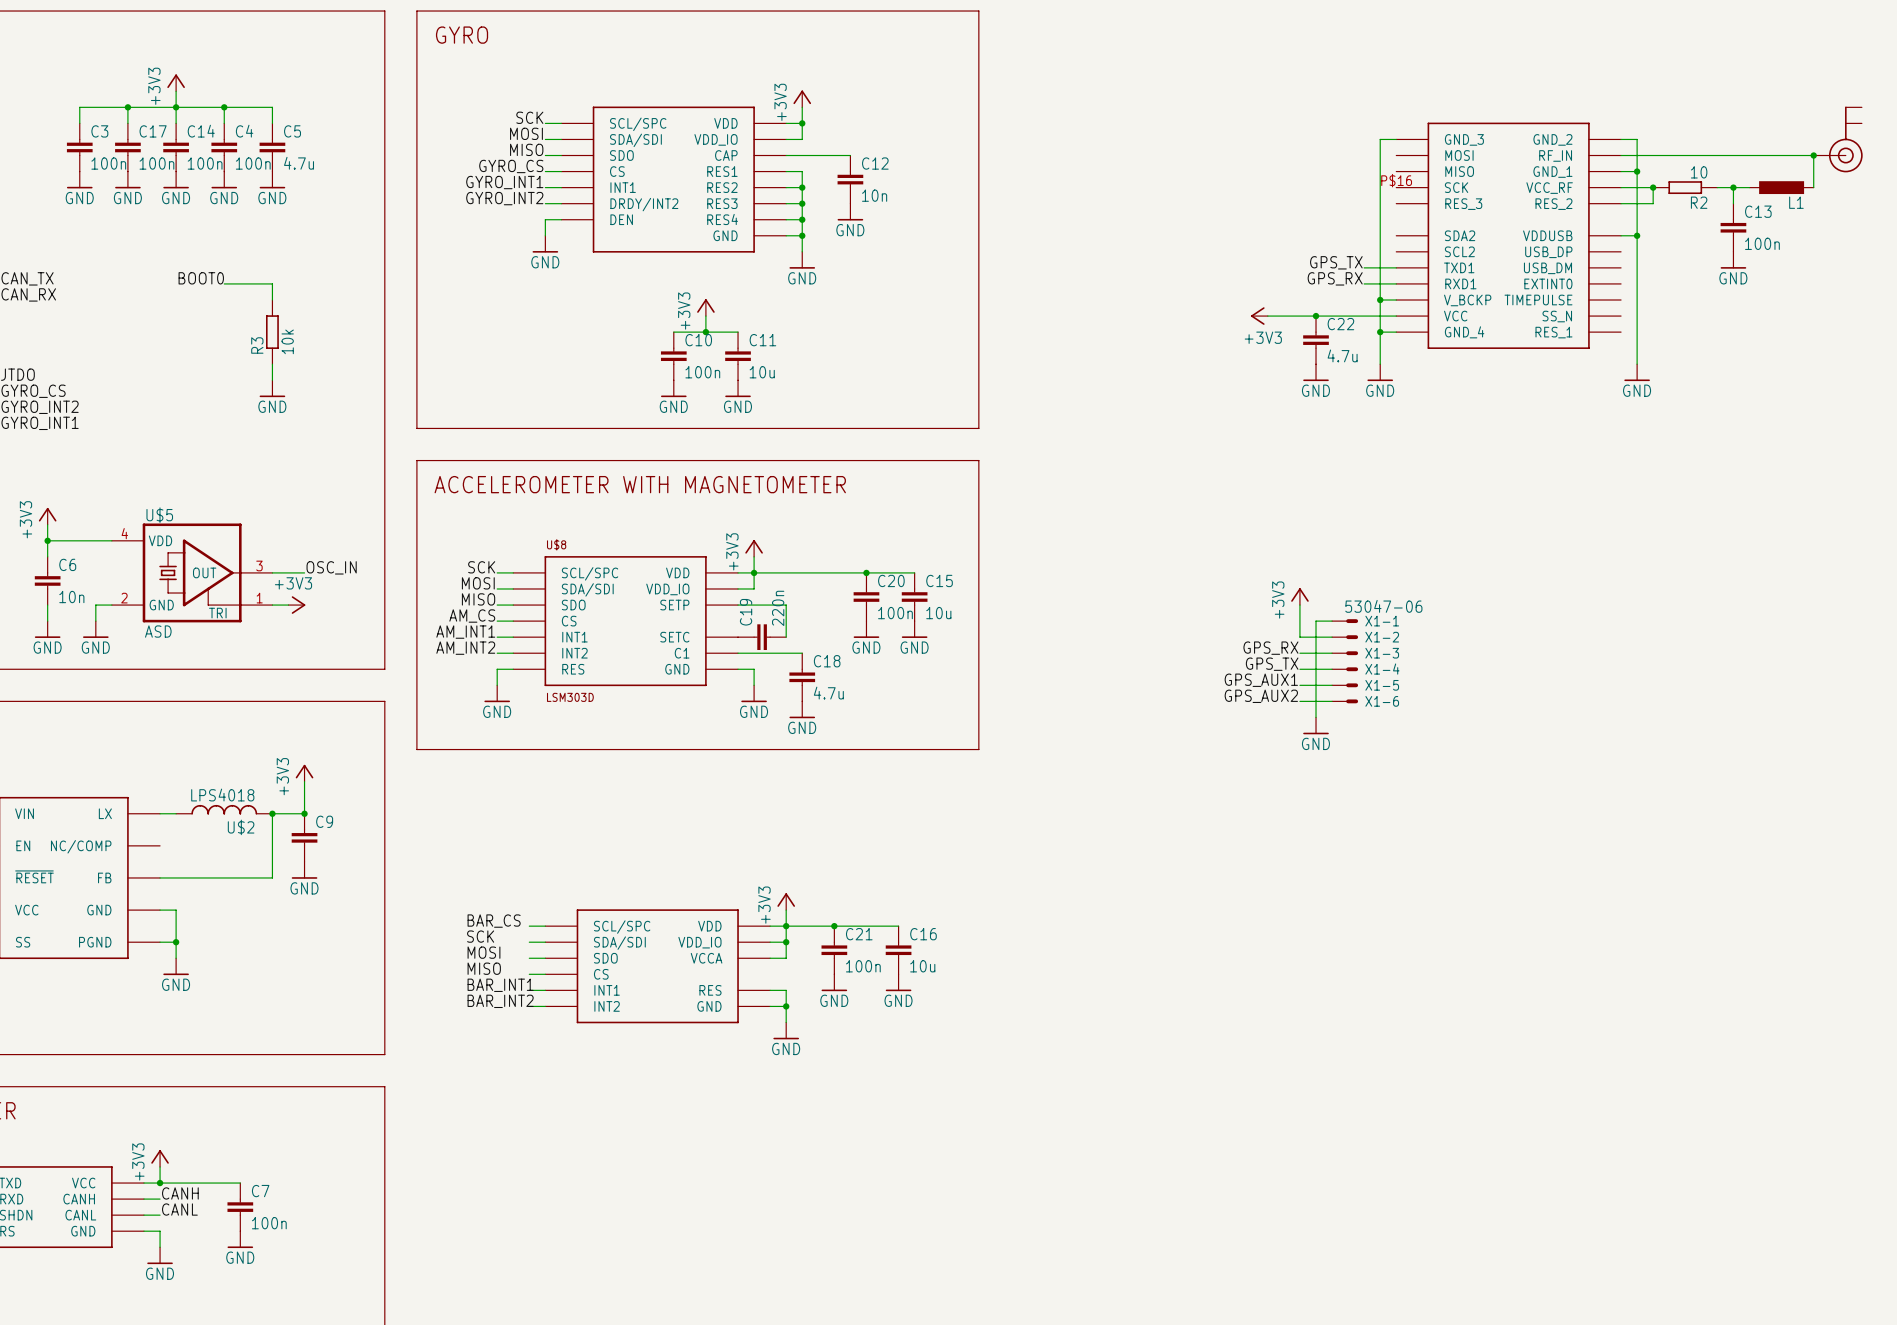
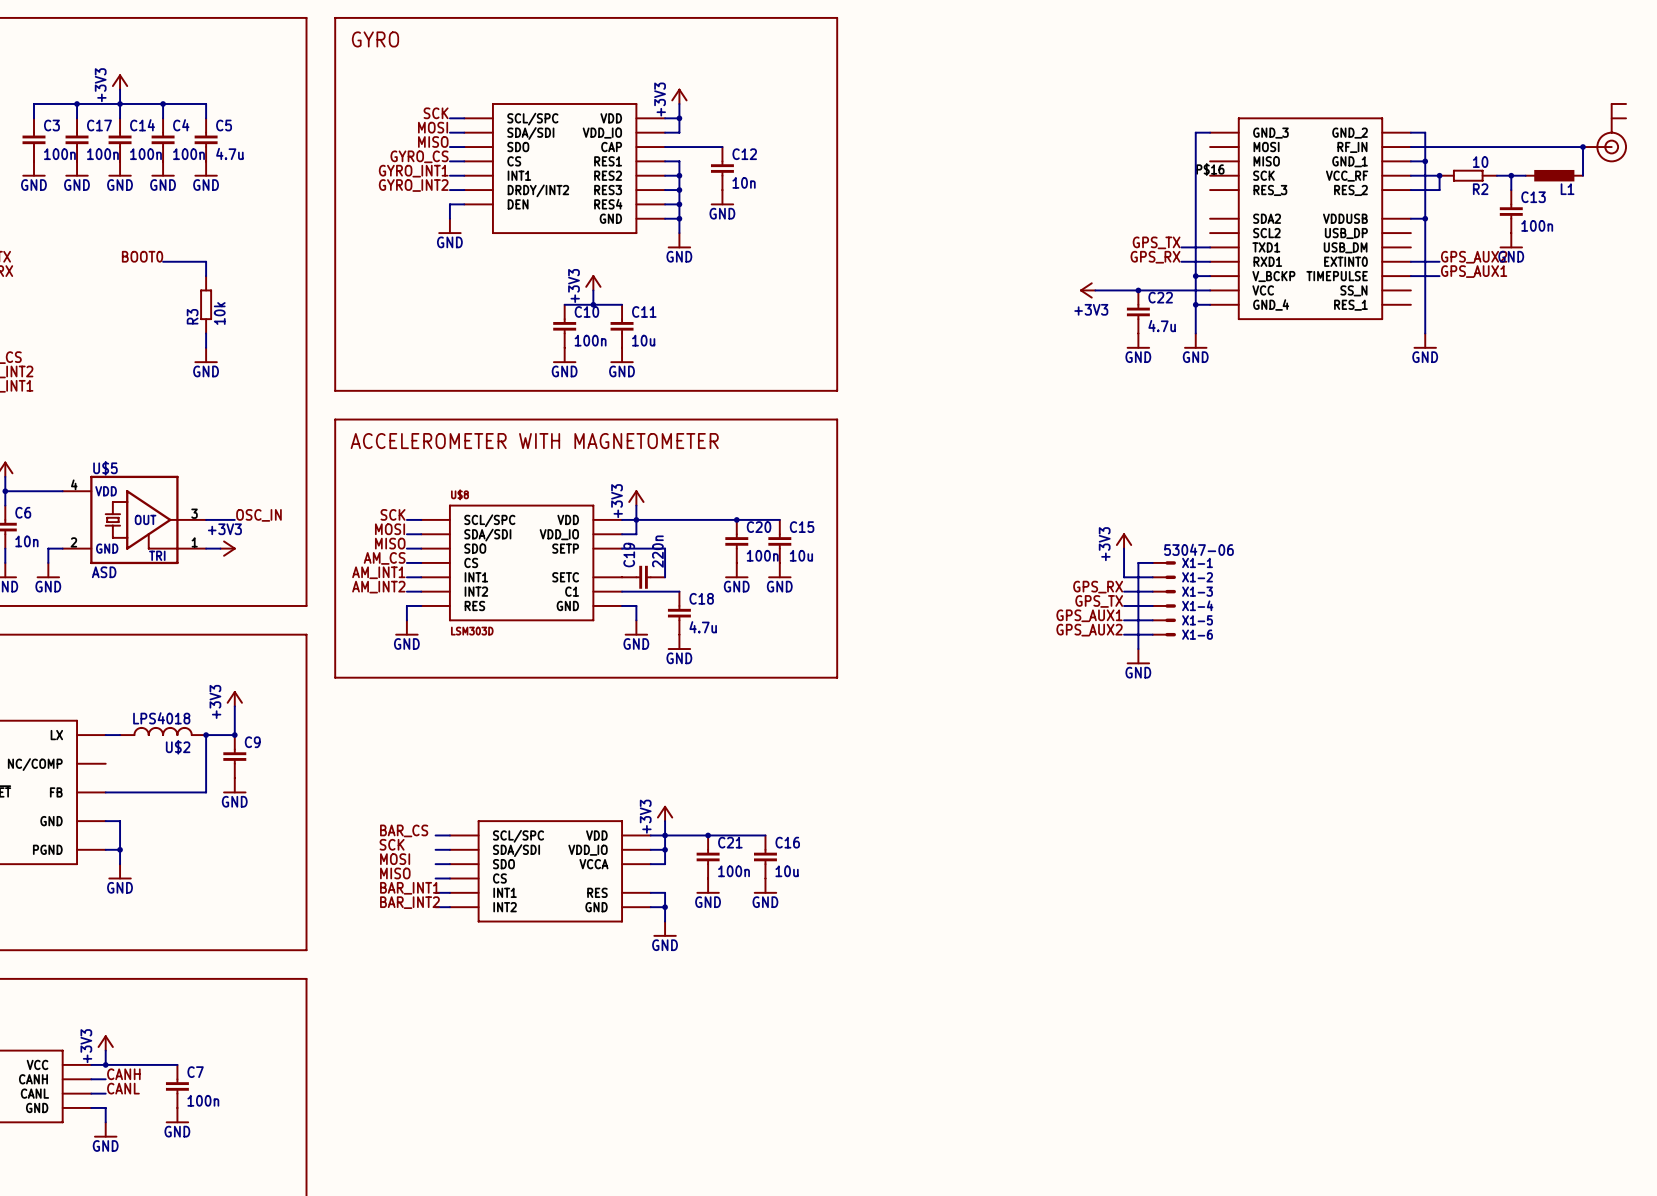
label: none -> GPS_AUX2 (1474, 257)
wire: none -> (1410, 261) (1439, 261)
label: none -> GPS_AUX1 (1474, 271)
wire: none -> (1410, 276) (1439, 276)

